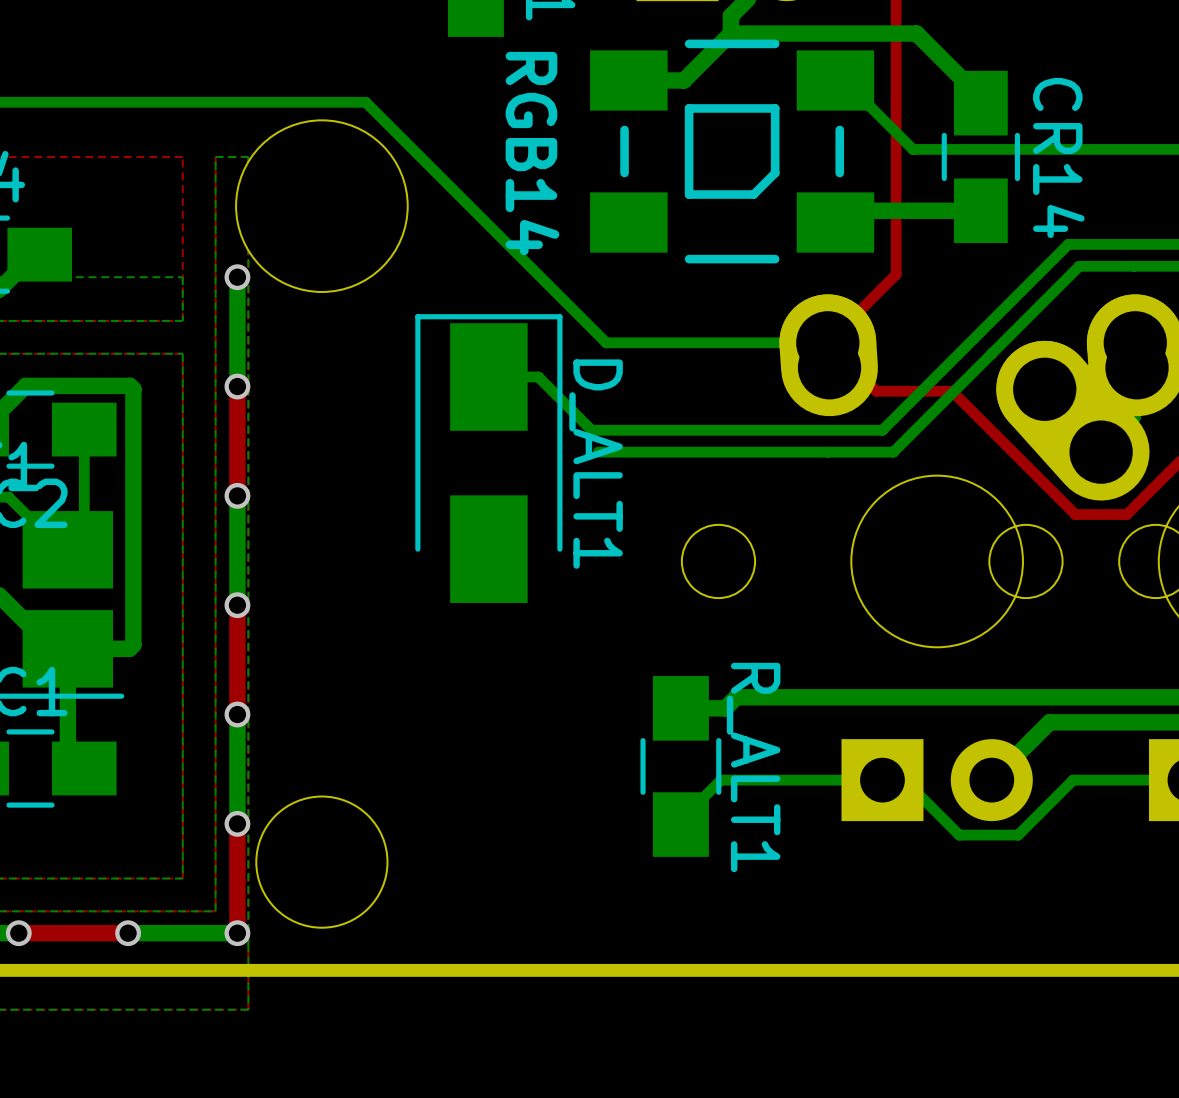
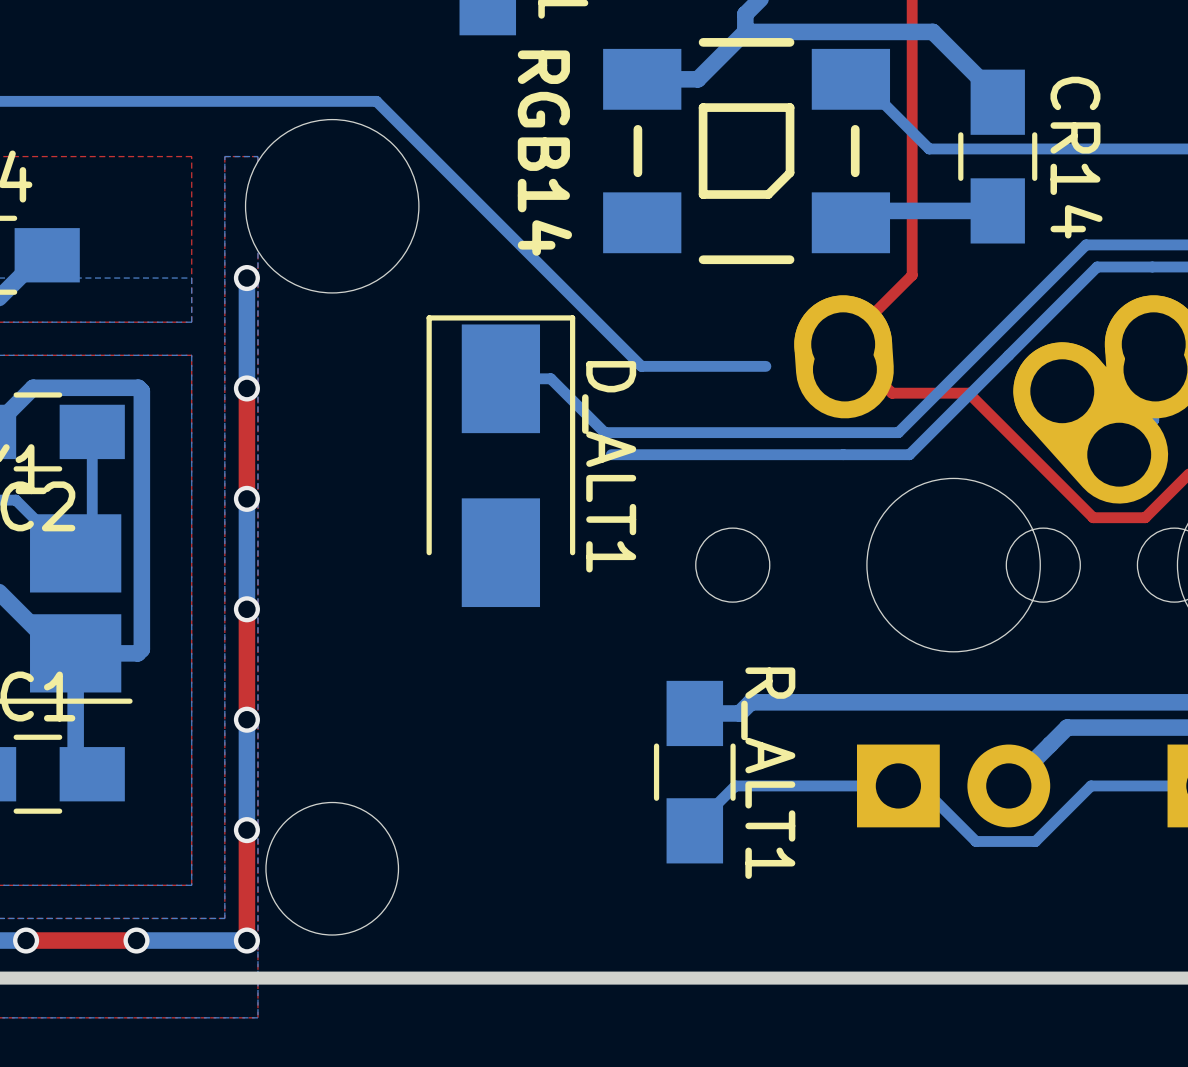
bottom track: (827, 342) (606, 342) -> (765, 366) (641, 366) (619, 344)

